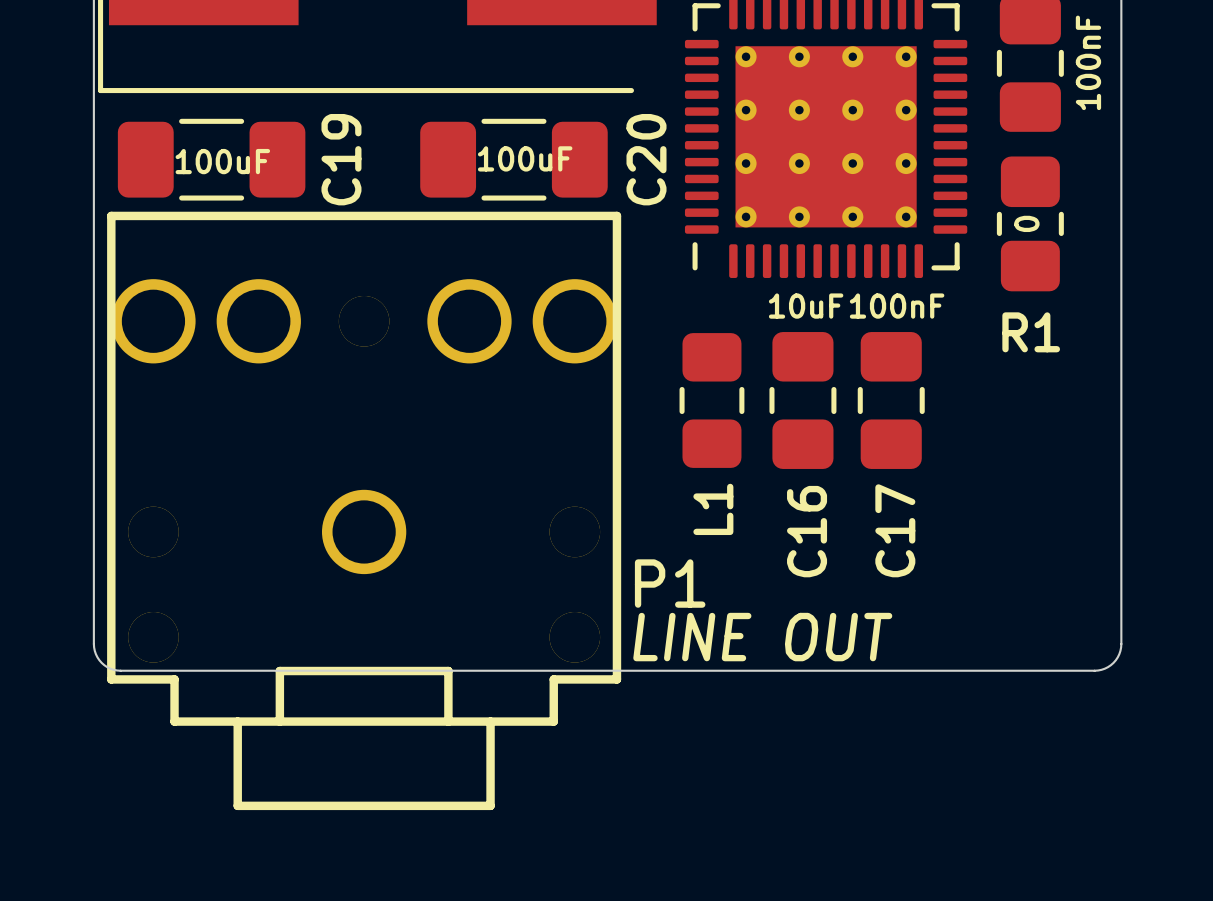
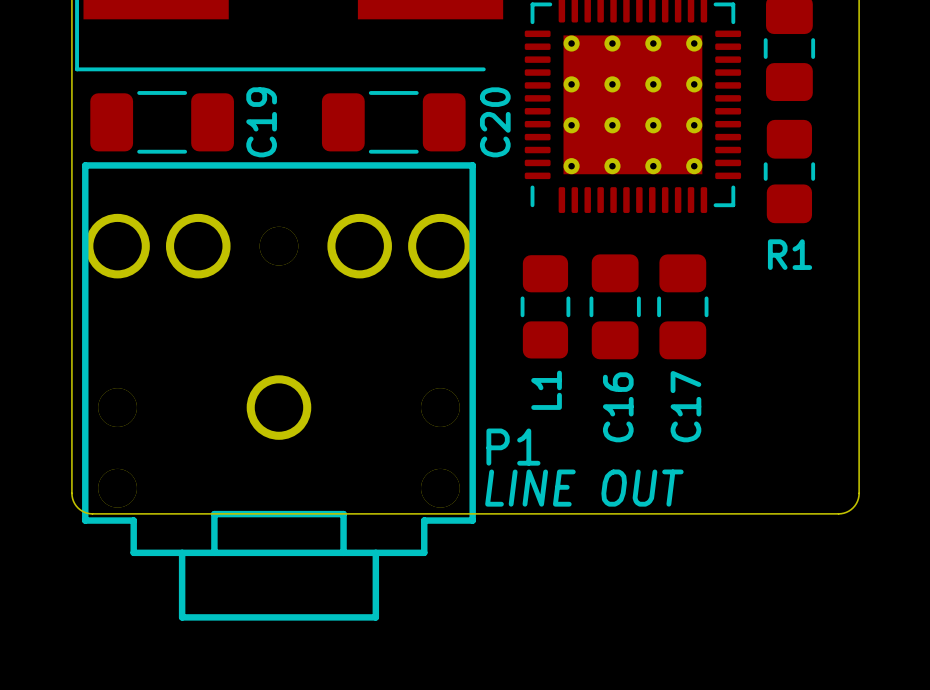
part value: 100nF (1088, 62) -> none
C20 value: 100uF (525, 158) -> none
C19 value: 100uF (222, 161) -> none
R1 value: 0 (1026, 223) -> none
C16 value: 10uF (806, 306) -> none
C17 value: 100nF (897, 306) -> none

